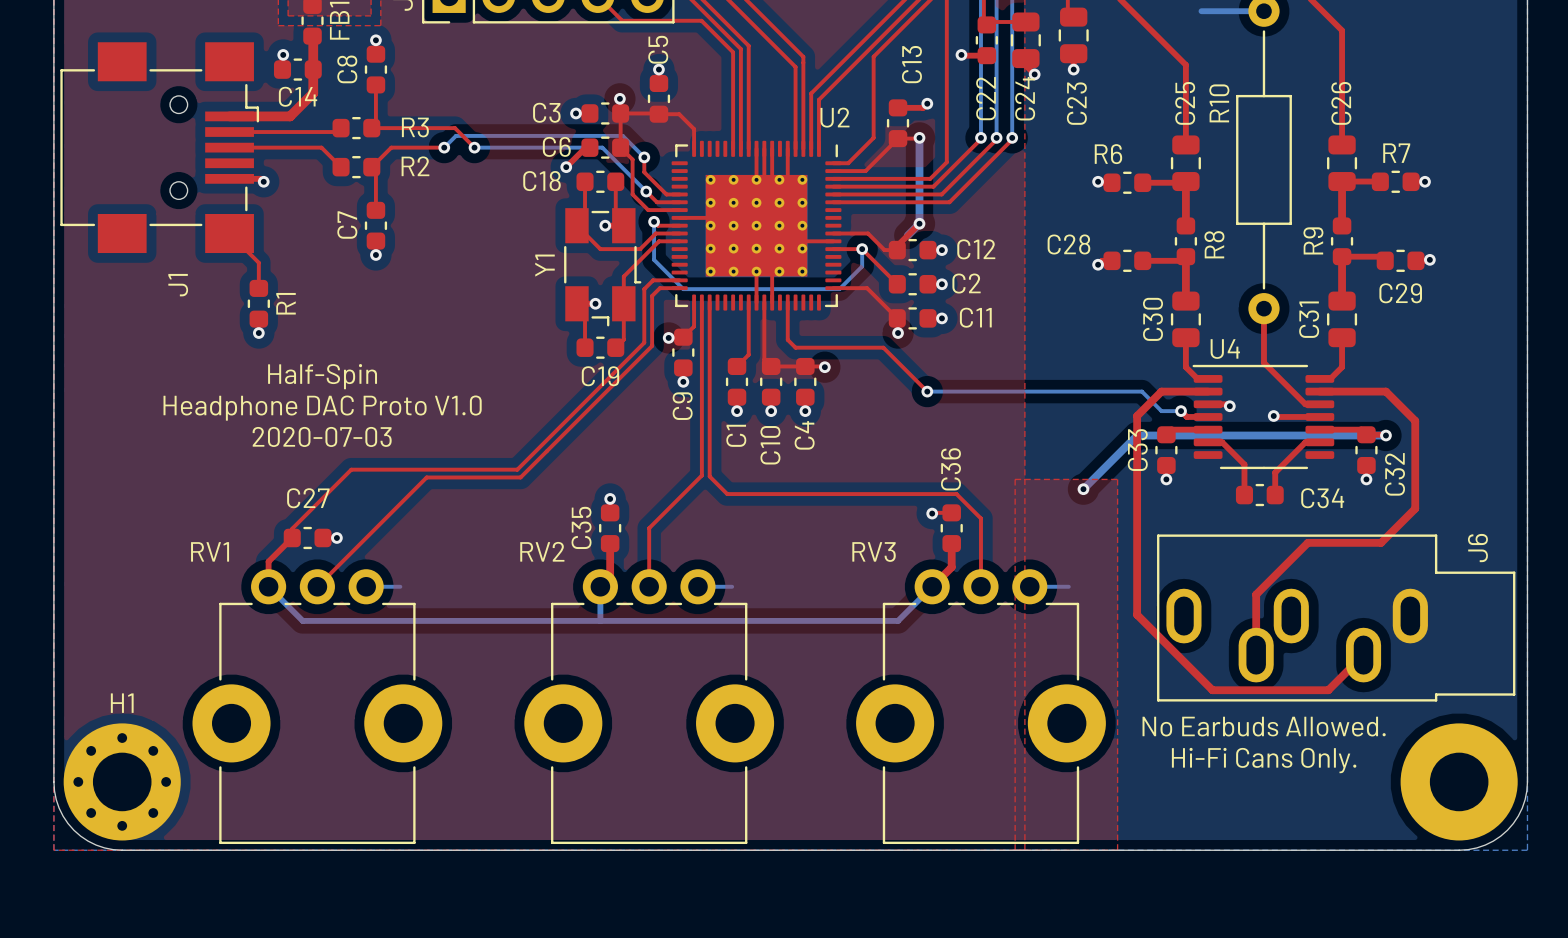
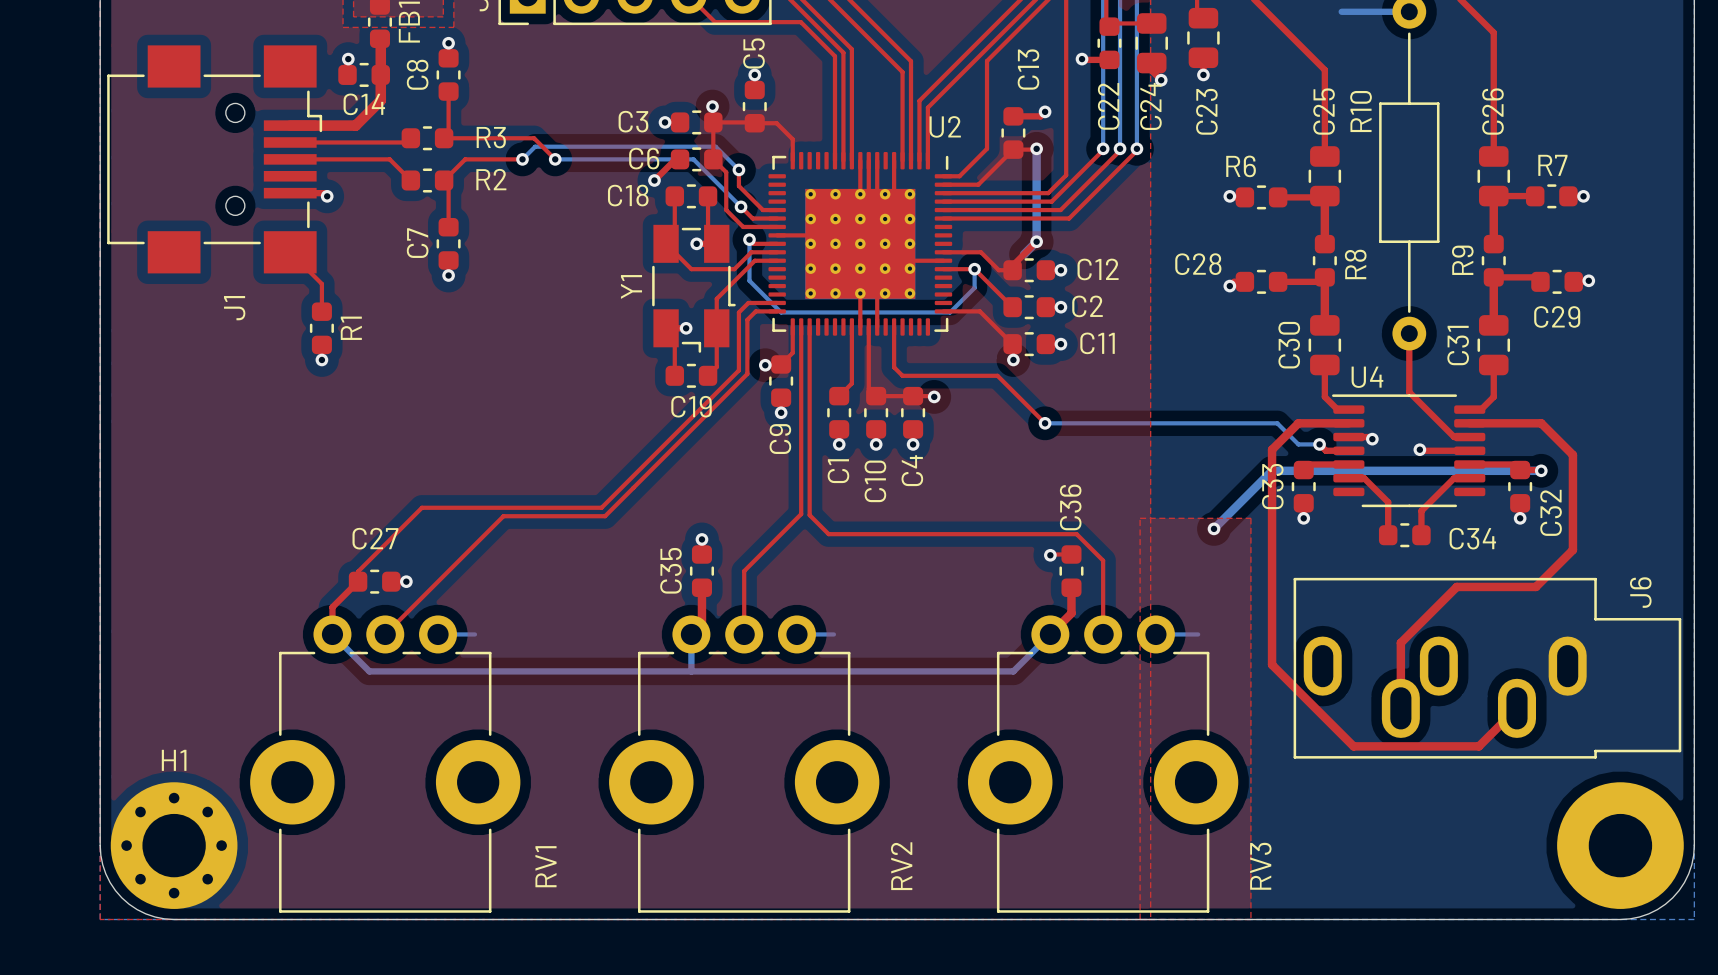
text: Half-Spin (322, 376) -> none
text: Headphone DAC Proto V1.0 (322, 408) -> none
text: 2020-07-03 (322, 436) -> none
RV1 name rotation: 0° (210, 551) -> 90° counterclockwise (545, 866)
RV1 name position: RV1 (210, 551) -> RV1 (545, 866)
RV2 name rotation: 0° (542, 551) -> 90° counterclockwise (901, 866)
RV2 name position: RV2 (542, 551) -> RV2 (901, 866)
RV3 name rotation: 0° (874, 552) -> 90° counterclockwise (1260, 866)
RV3 name position: RV3 (874, 552) -> RV3 (1260, 866)
text: No Earbuds Allowed. (1264, 726) -> none
text: Hi-Fi Cans Only. (1264, 760) -> none

